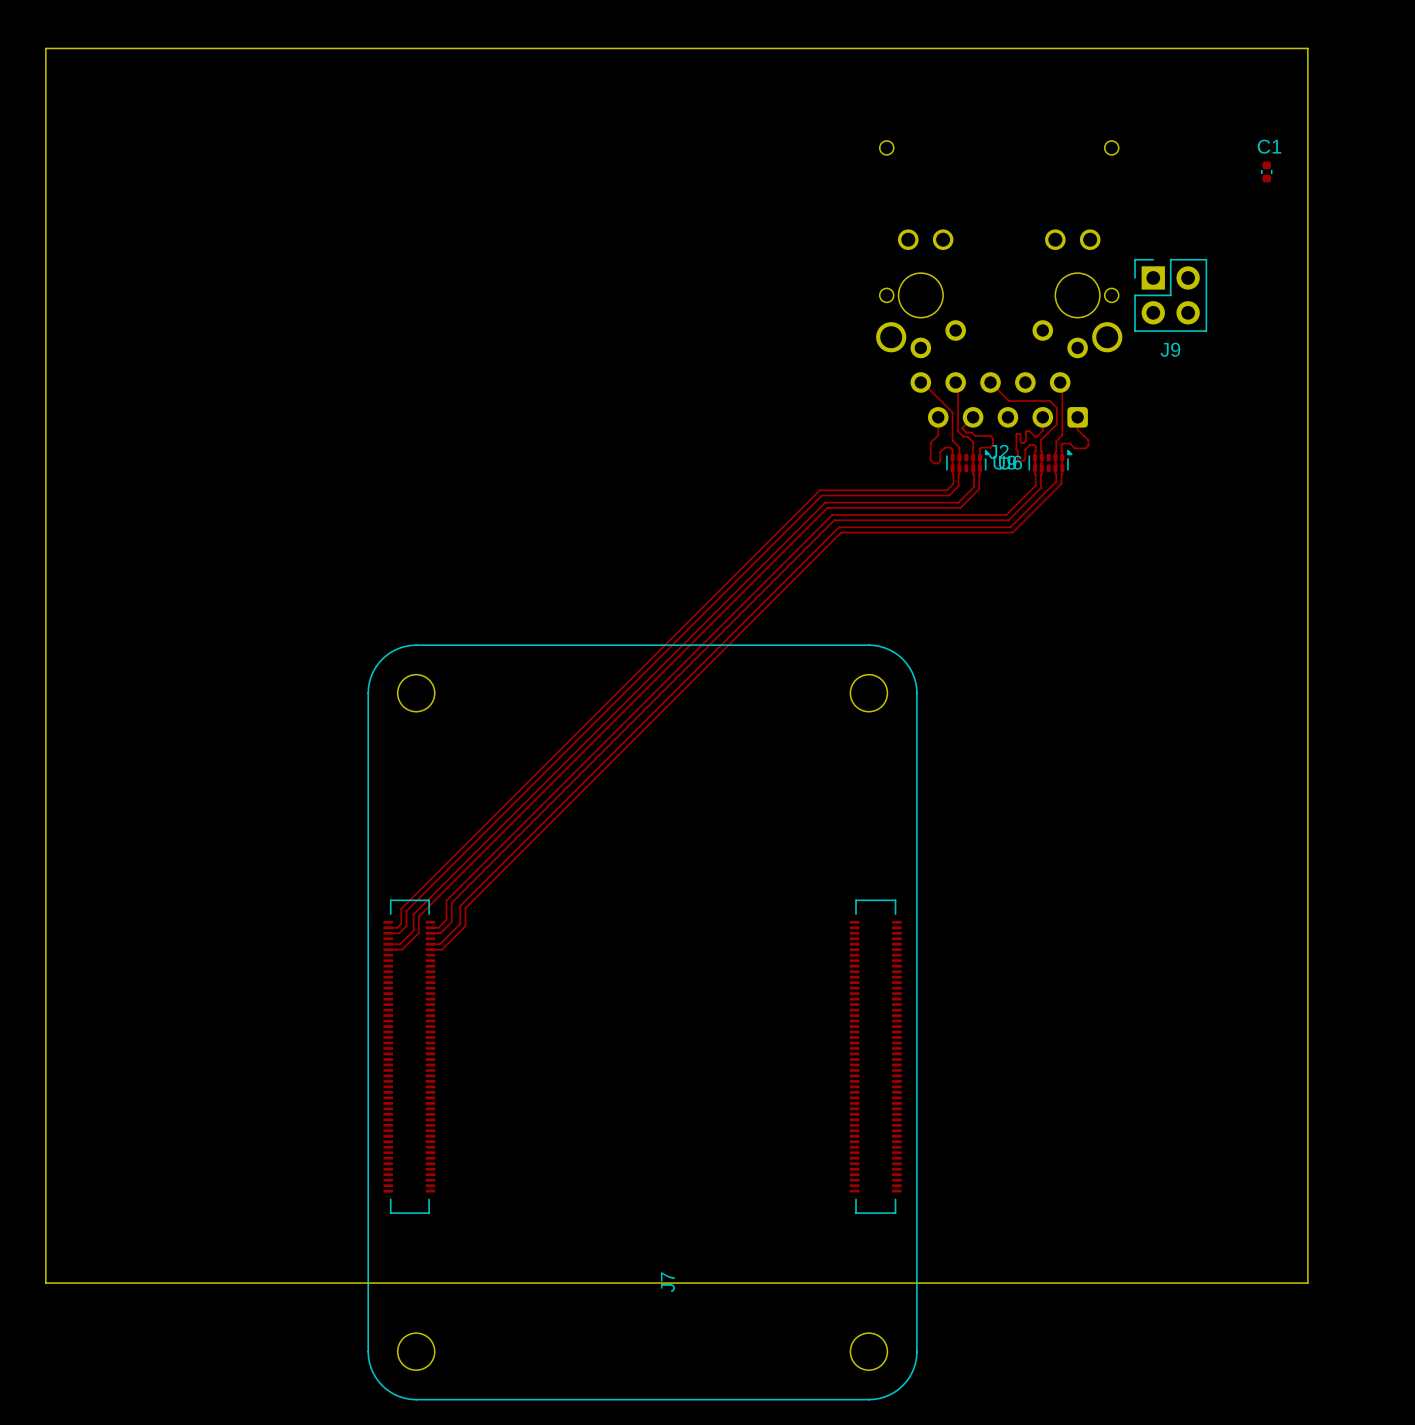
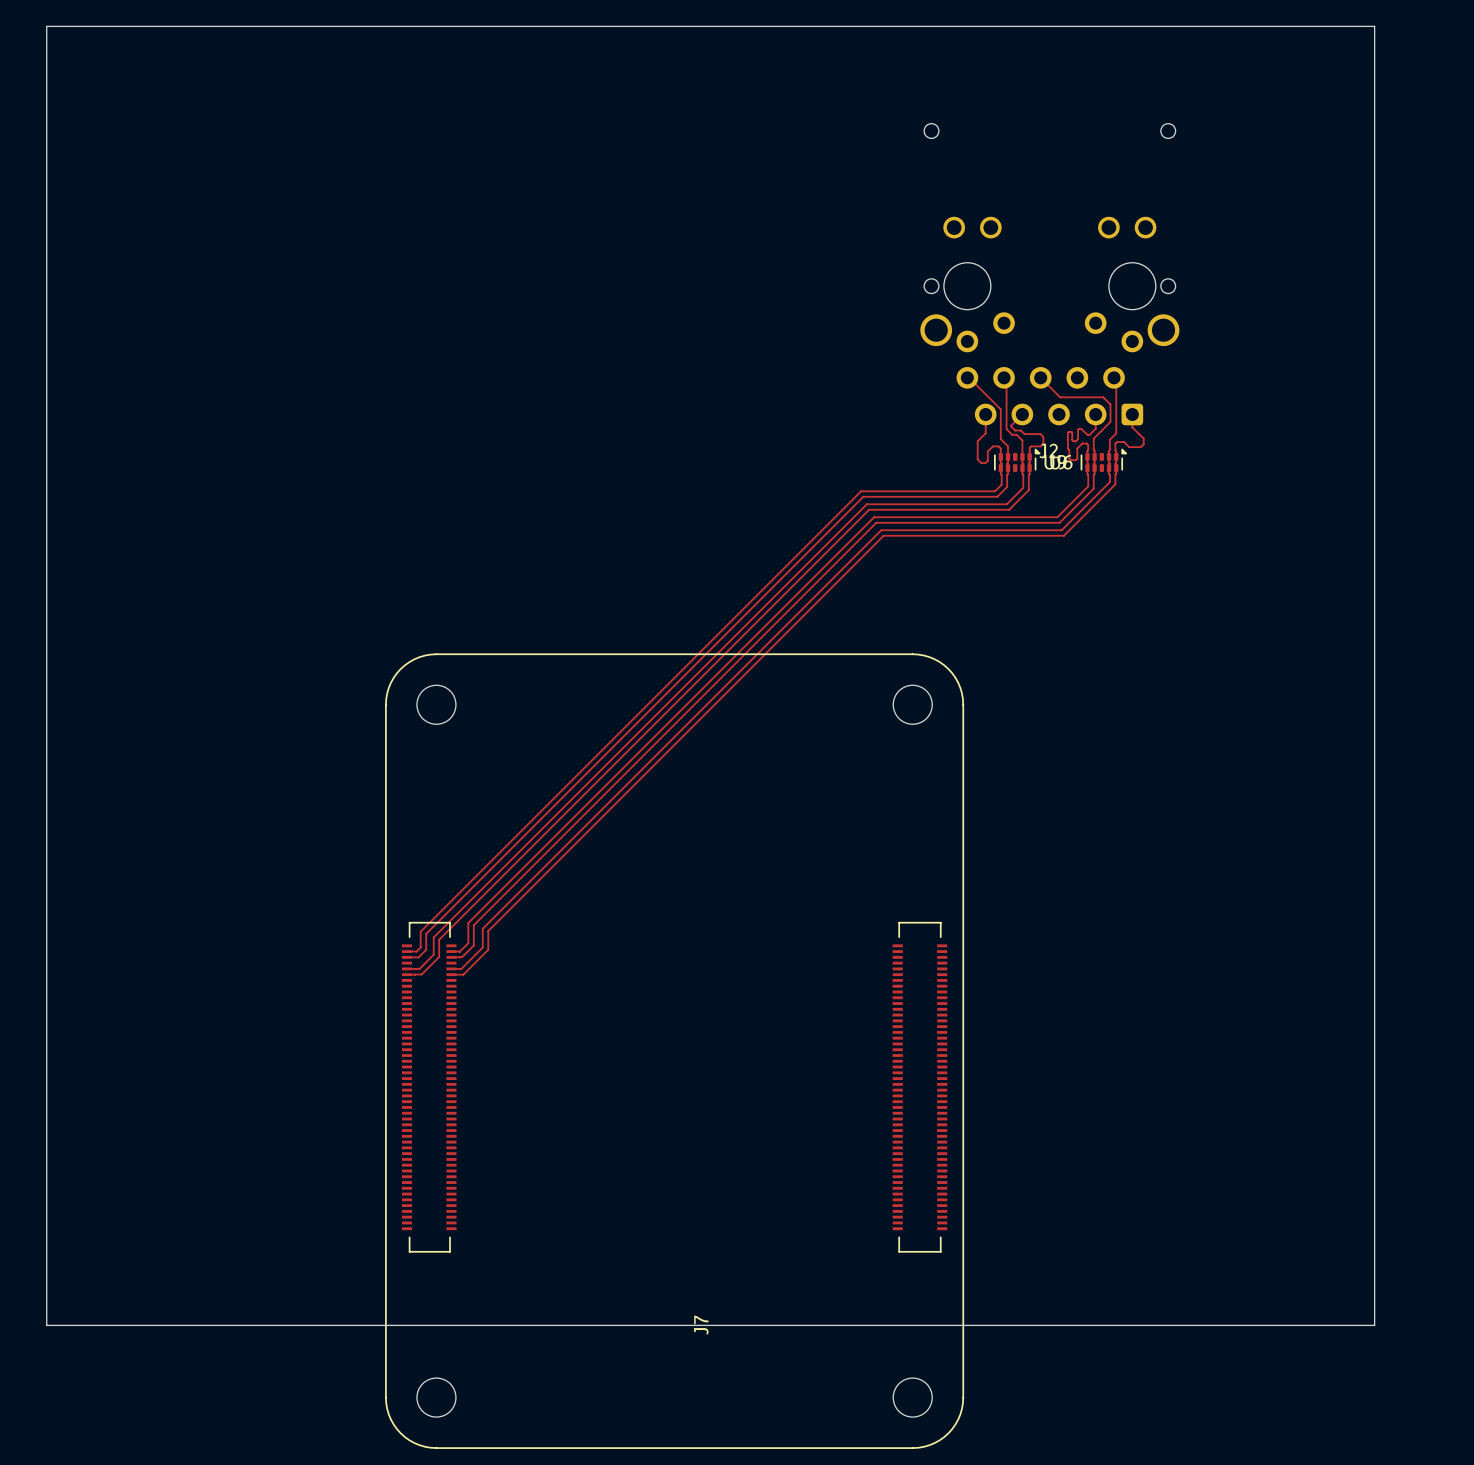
C1: (1266, 171) -> none
J9: (1170, 295) -> none

